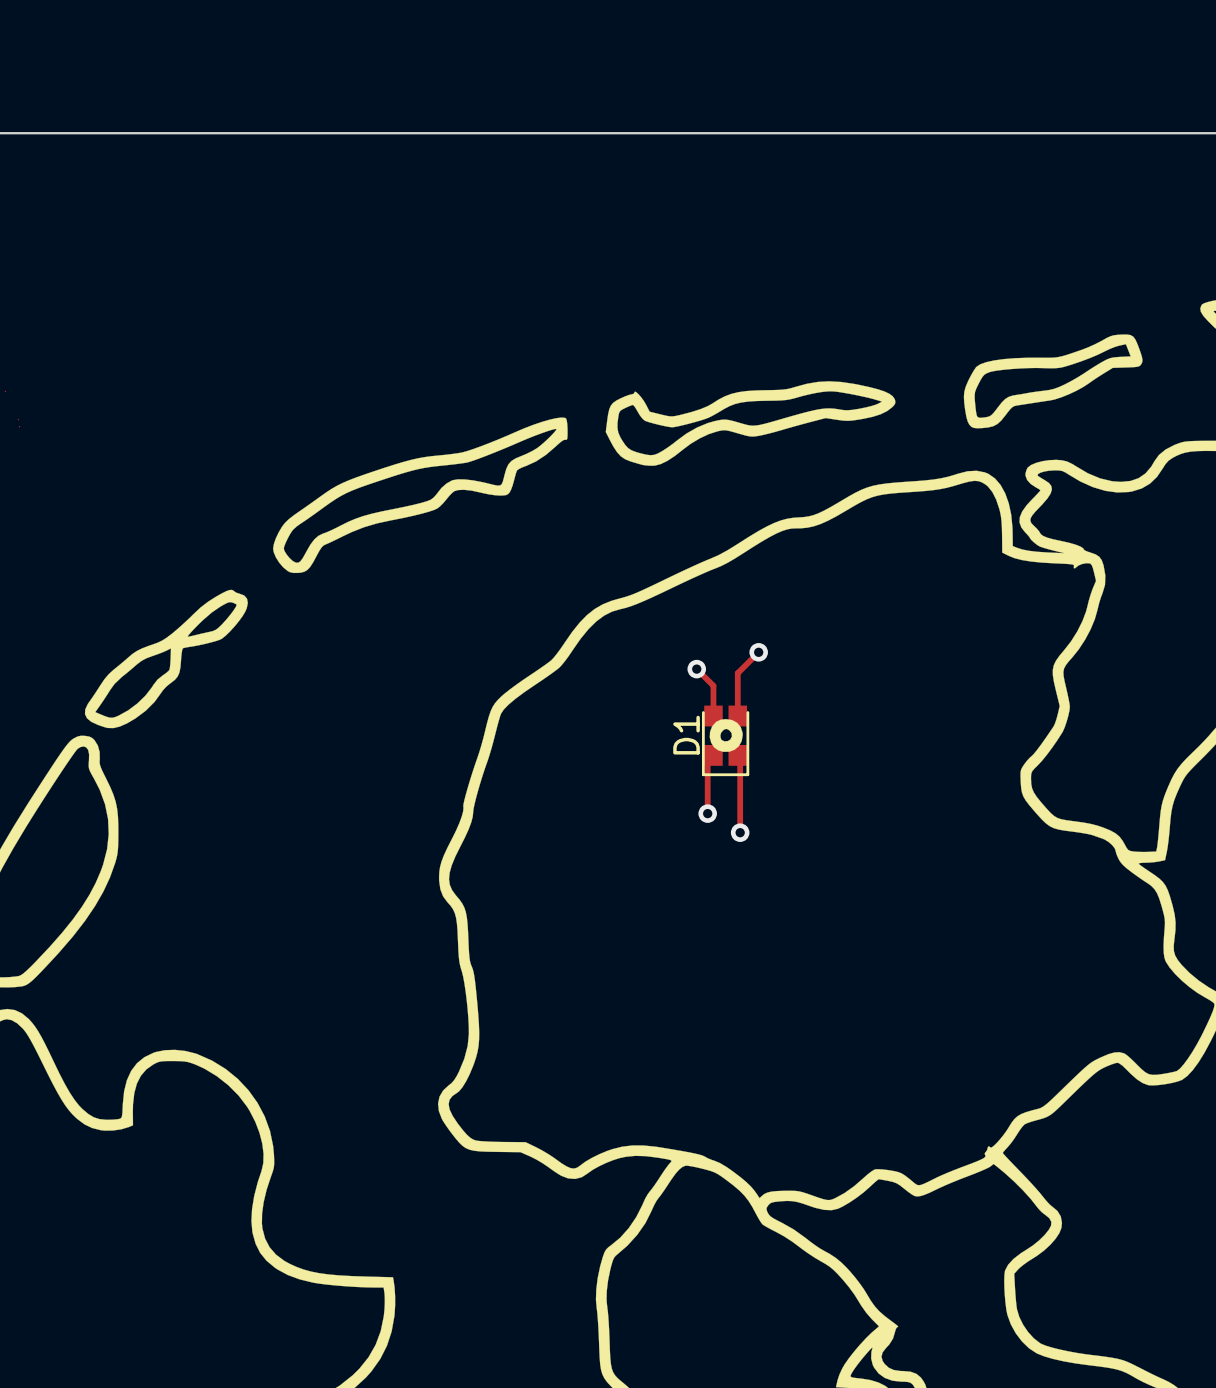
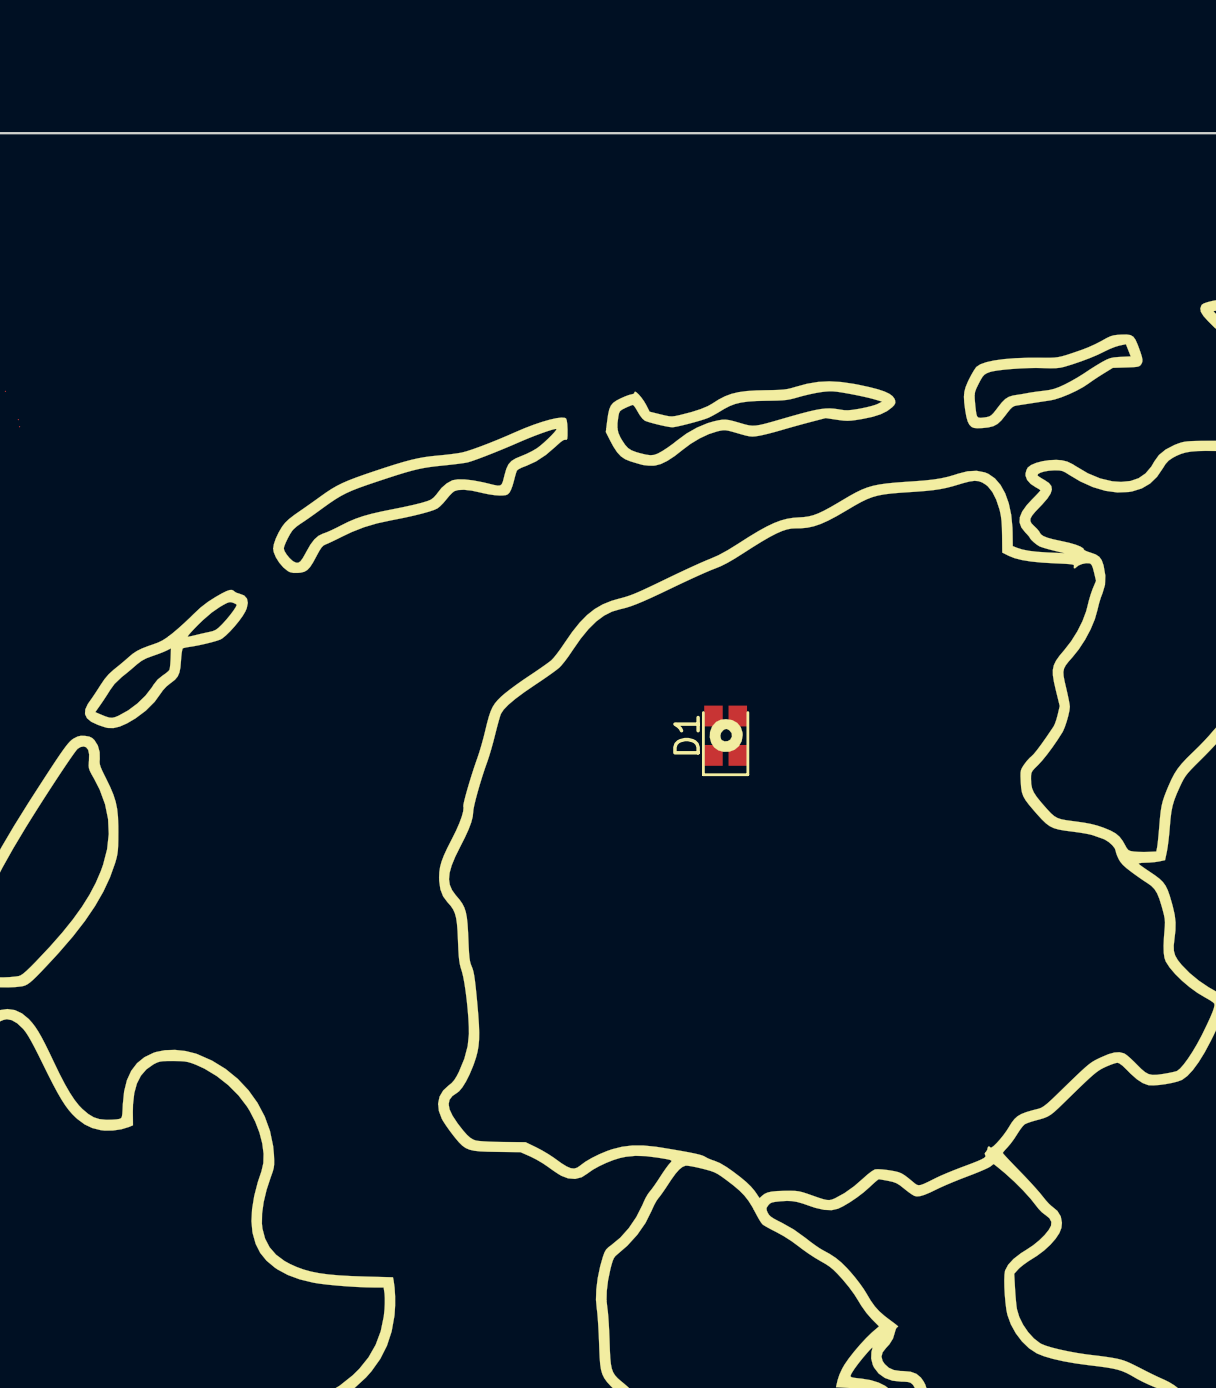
track: (758, 652) (737, 673) (737, 716) -> none
via: (758, 652) -> none
track: (696, 669) (713, 685) (713, 716) -> none
via: (696, 669) -> none
track: (713, 755) (707, 761) (707, 813) -> none
track: (737, 755) (740, 757) (740, 832) -> none
via: (707, 813) -> none
via: (740, 832) -> none

